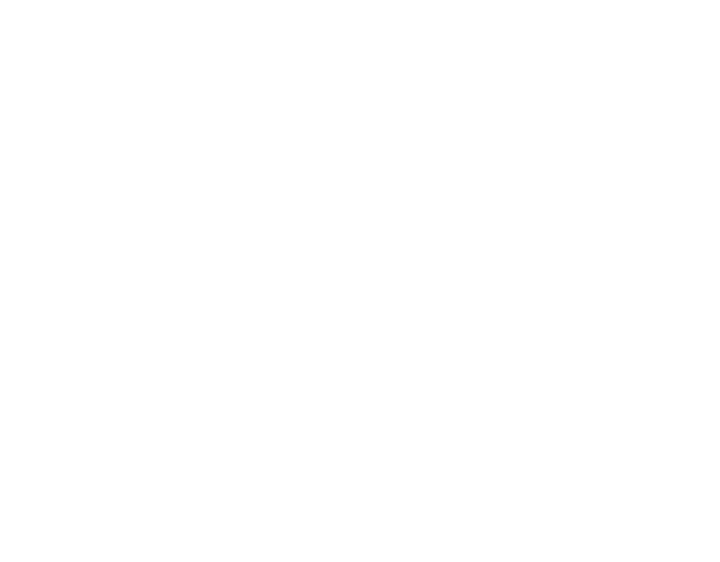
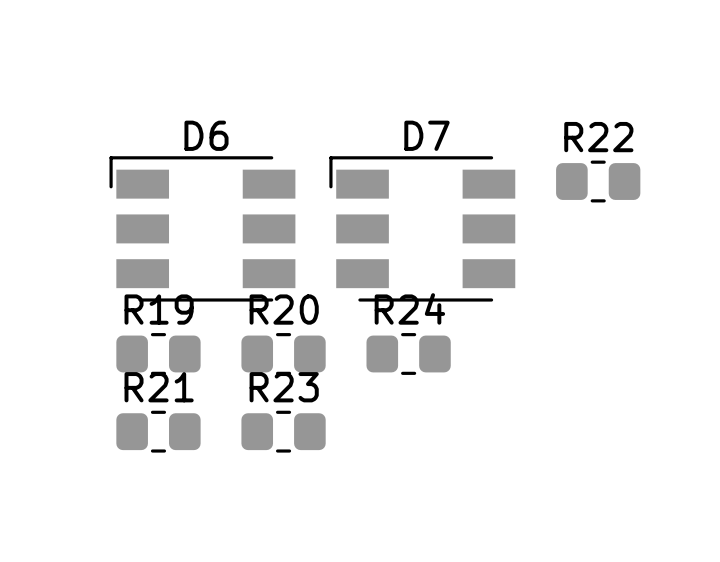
R22: none -> (598, 181)
D6: none -> (202, 228)
D7: none -> (422, 228)
R19: none -> (158, 353)
R20: none -> (283, 353)
R24: none -> (408, 353)
R21: none -> (158, 431)
R23: none -> (283, 431)

